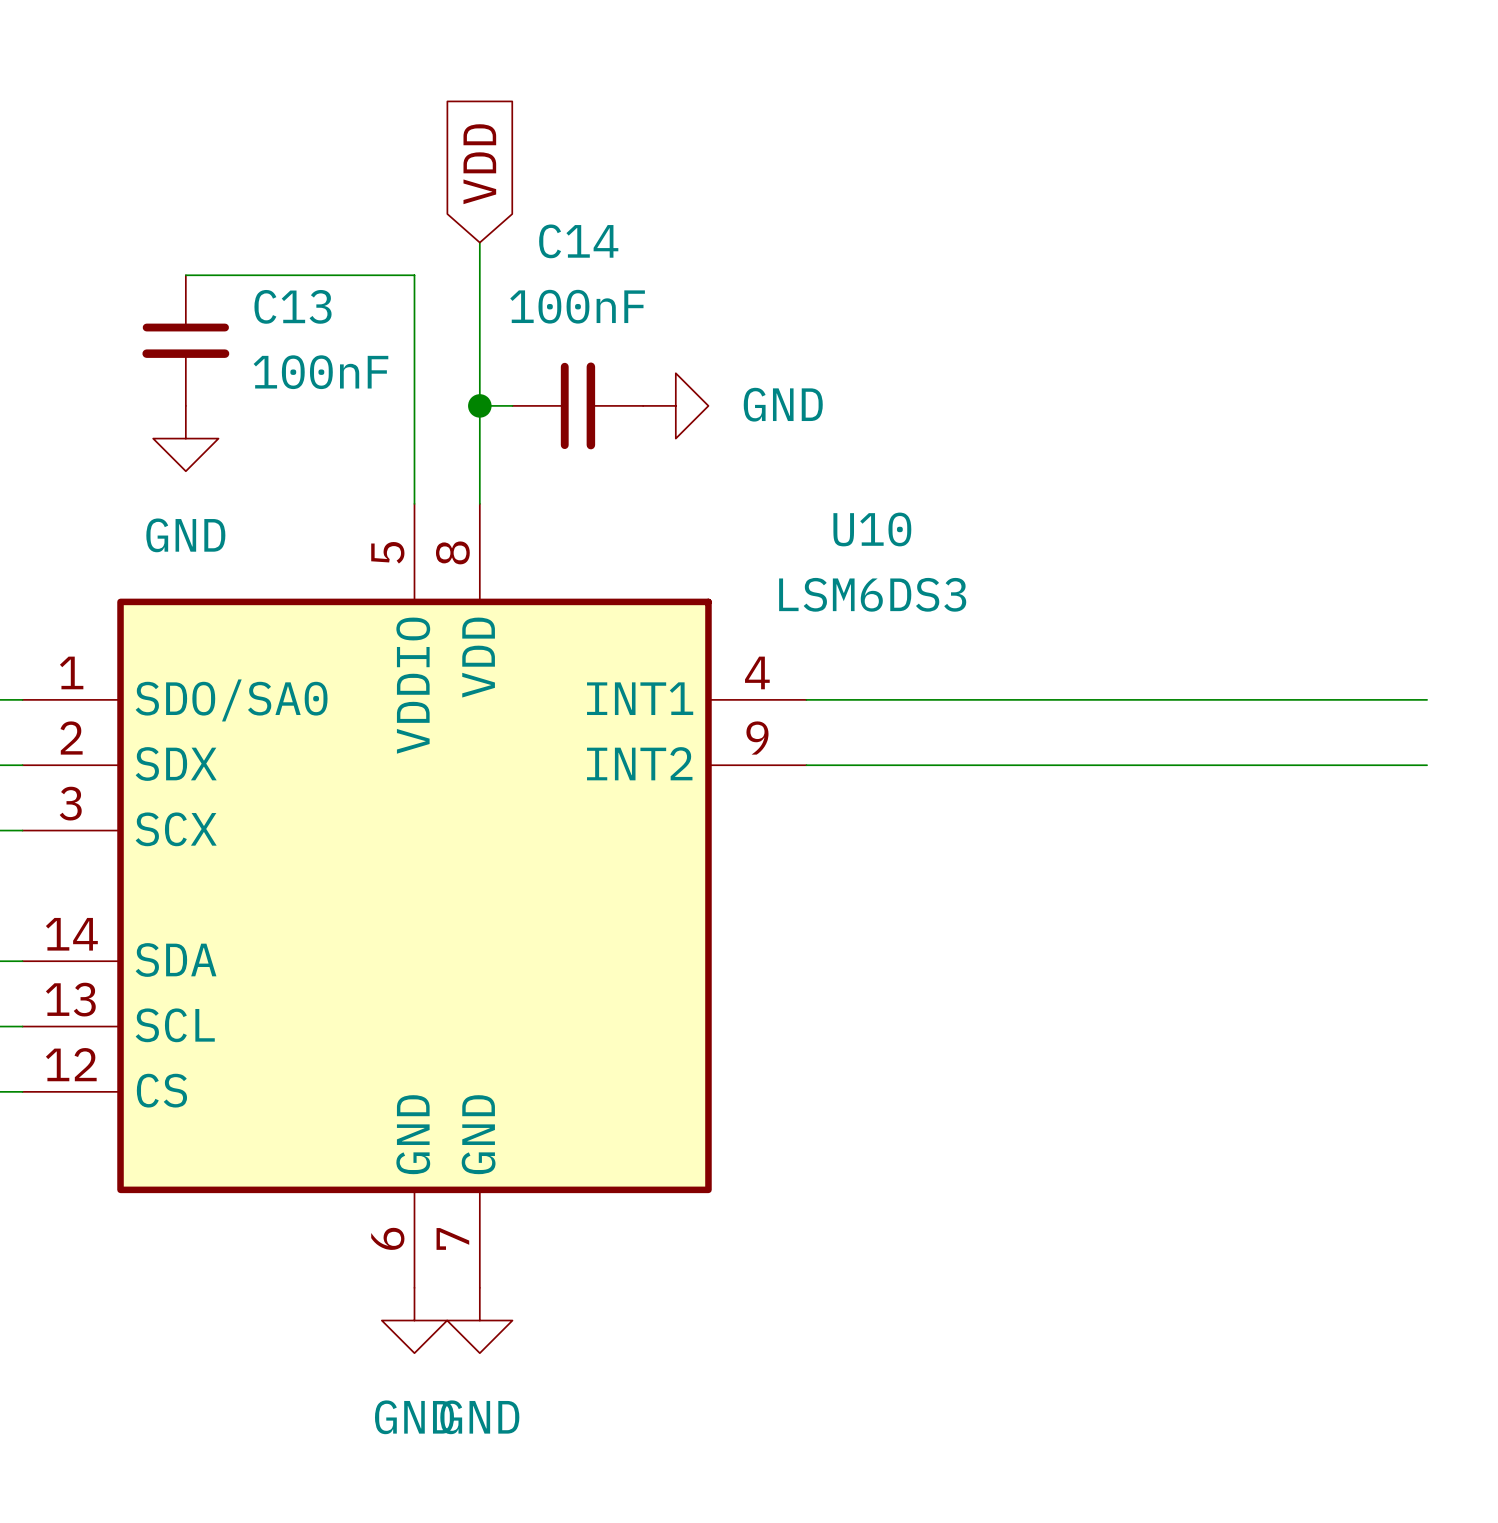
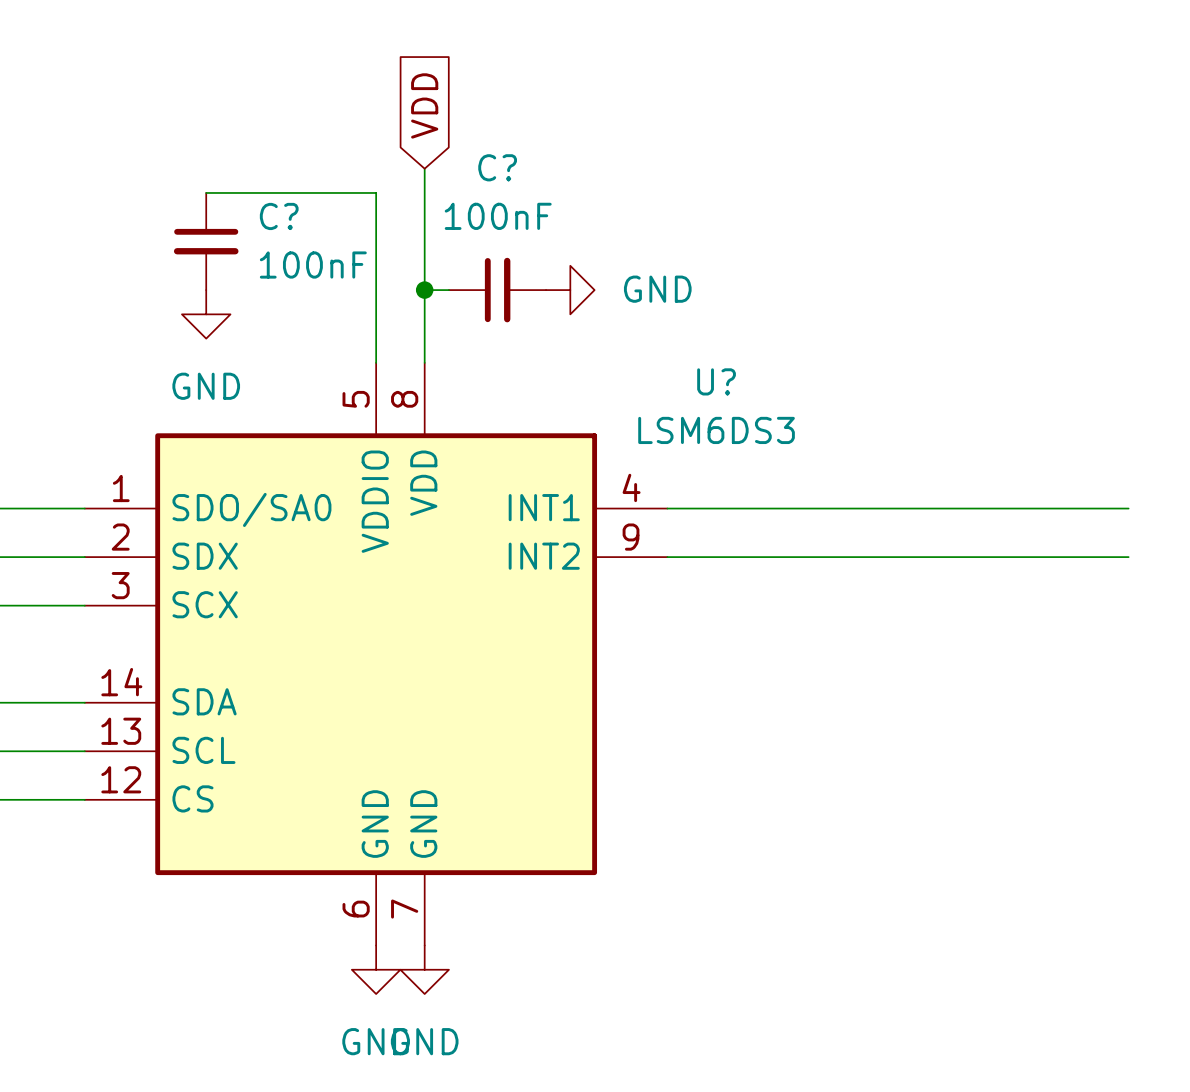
C14 name: C14 (578, 241) -> C? (497, 167)
C13 name: C13 (293, 306) -> C? (279, 216)
U10 name: U10 (872, 529) -> U? (716, 381)

